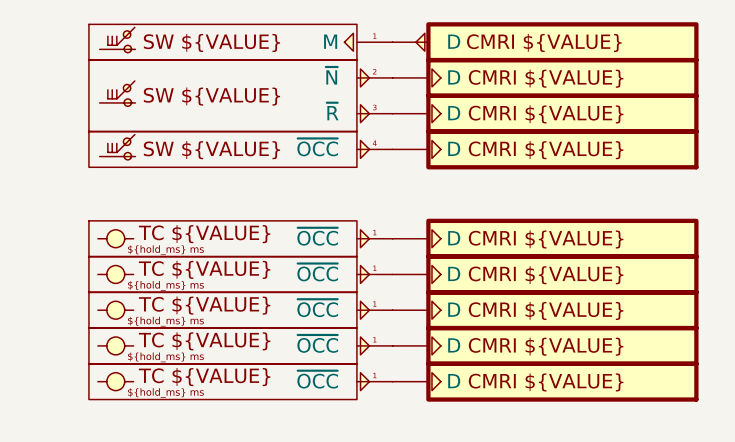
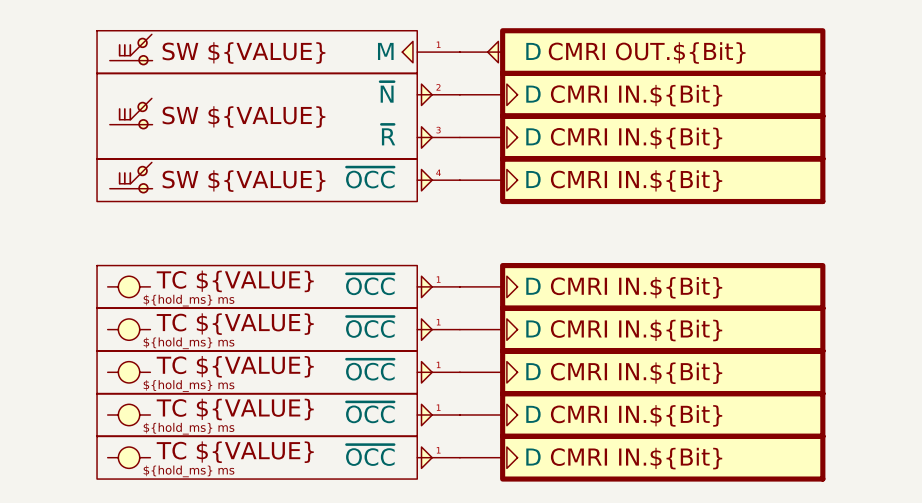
part text: CMRI ${VALUE} (544, 42) -> CMRI OUT.${Bit} (647, 53)
part text: CMRI ${VALUE} (546, 78) -> CMRI IN.${Bit} (636, 95)
part text: CMRI ${VALUE} (546, 114) -> CMRI IN.${Bit} (636, 138)
part text: CMRI ${VALUE} (546, 150) -> CMRI IN.${Bit} (636, 181)
part text: CMRI ${VALUE} (546, 239) -> CMRI IN.${Bit} (636, 287)
part text: CMRI ${VALUE} (546, 275) -> CMRI IN.${Bit} (636, 330)
part text: CMRI ${VALUE} (546, 310) -> CMRI IN.${Bit} (636, 373)
part text: CMRI ${VALUE} (546, 346) -> CMRI IN.${Bit} (636, 415)
part text: CMRI ${VALUE} (546, 382) -> CMRI IN.${Bit} (636, 458)

